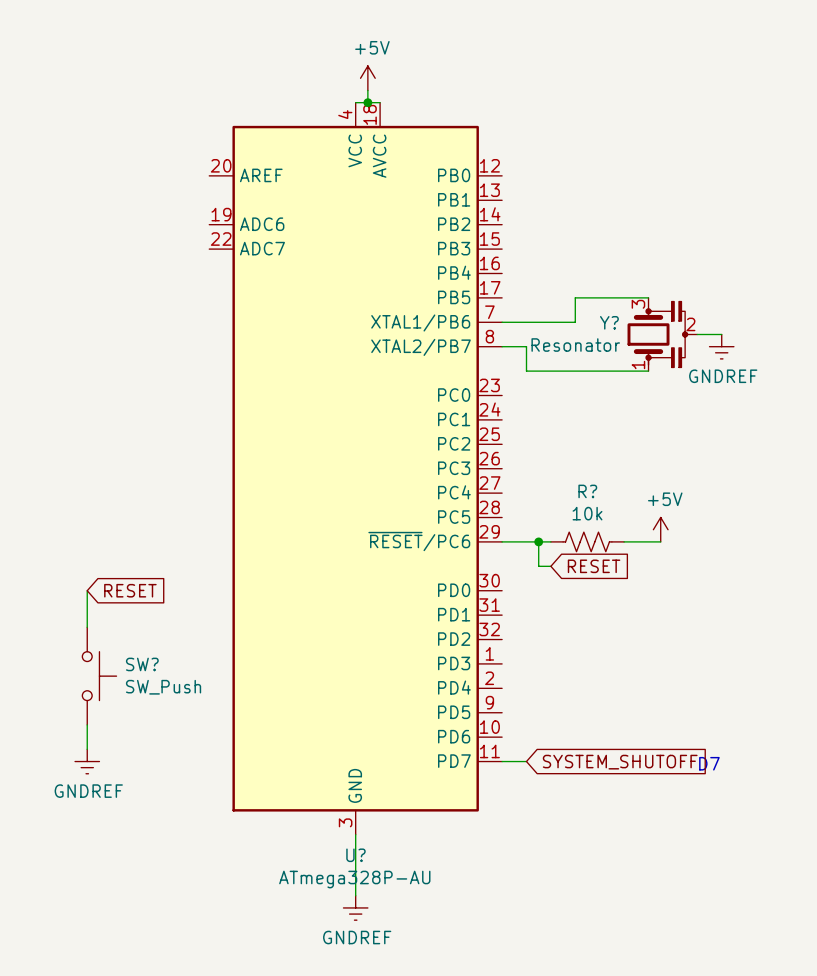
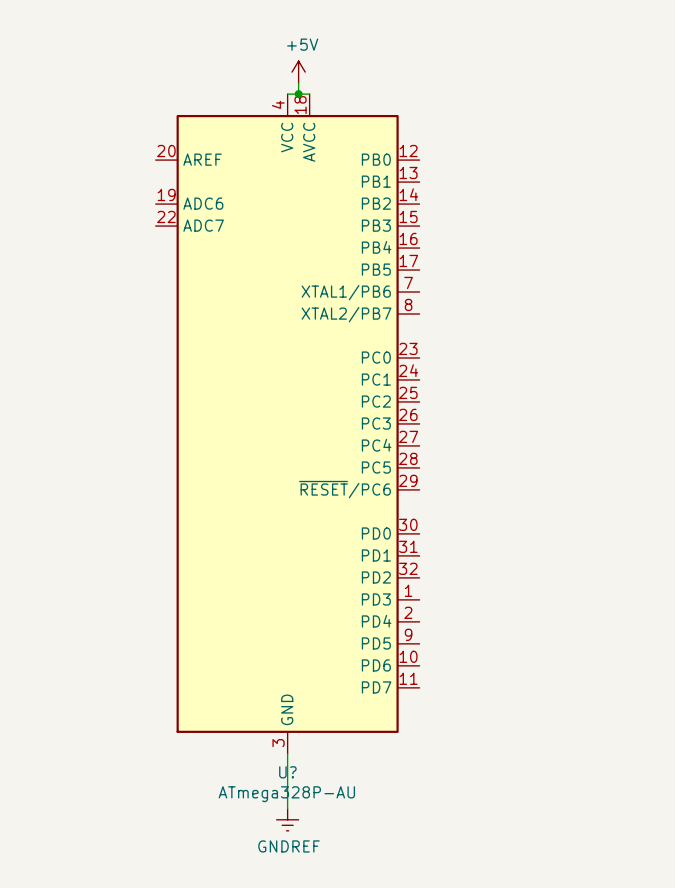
wire: (648, 297) (575, 297) (575, 322) (502, 322) -> none
Y?: Resonator (662, 334) -> none
wire: (697, 334) (721, 334) -> none
wire: (502, 346) (526, 346) (526, 371) (648, 371) -> none
power symbol: GNDREF (721, 346) -> none
power symbol: +5V (660, 529) -> none
wire: (502, 541) (550, 541) -> none
wire: (538, 541) (538, 566) (550, 566) -> none
junction: (538, 541) -> none
R?: 10k (587, 541) -> none
wire: (624, 541) (660, 541) -> none
global label: RESET (594, 566) -> none
wire: (87, 590) (87, 627) -> none
global label: RESET (130, 590) -> none
SW?: SW_Push (99, 676) -> none
wire: (87, 724) (87, 749) -> none
power symbol: GNDREF (87, 761) -> none
wire: (502, 761) (526, 761) -> none
global label: SYSTEM_SHUTOFF (620, 762) -> none
text: D7 (709, 763) -> none

